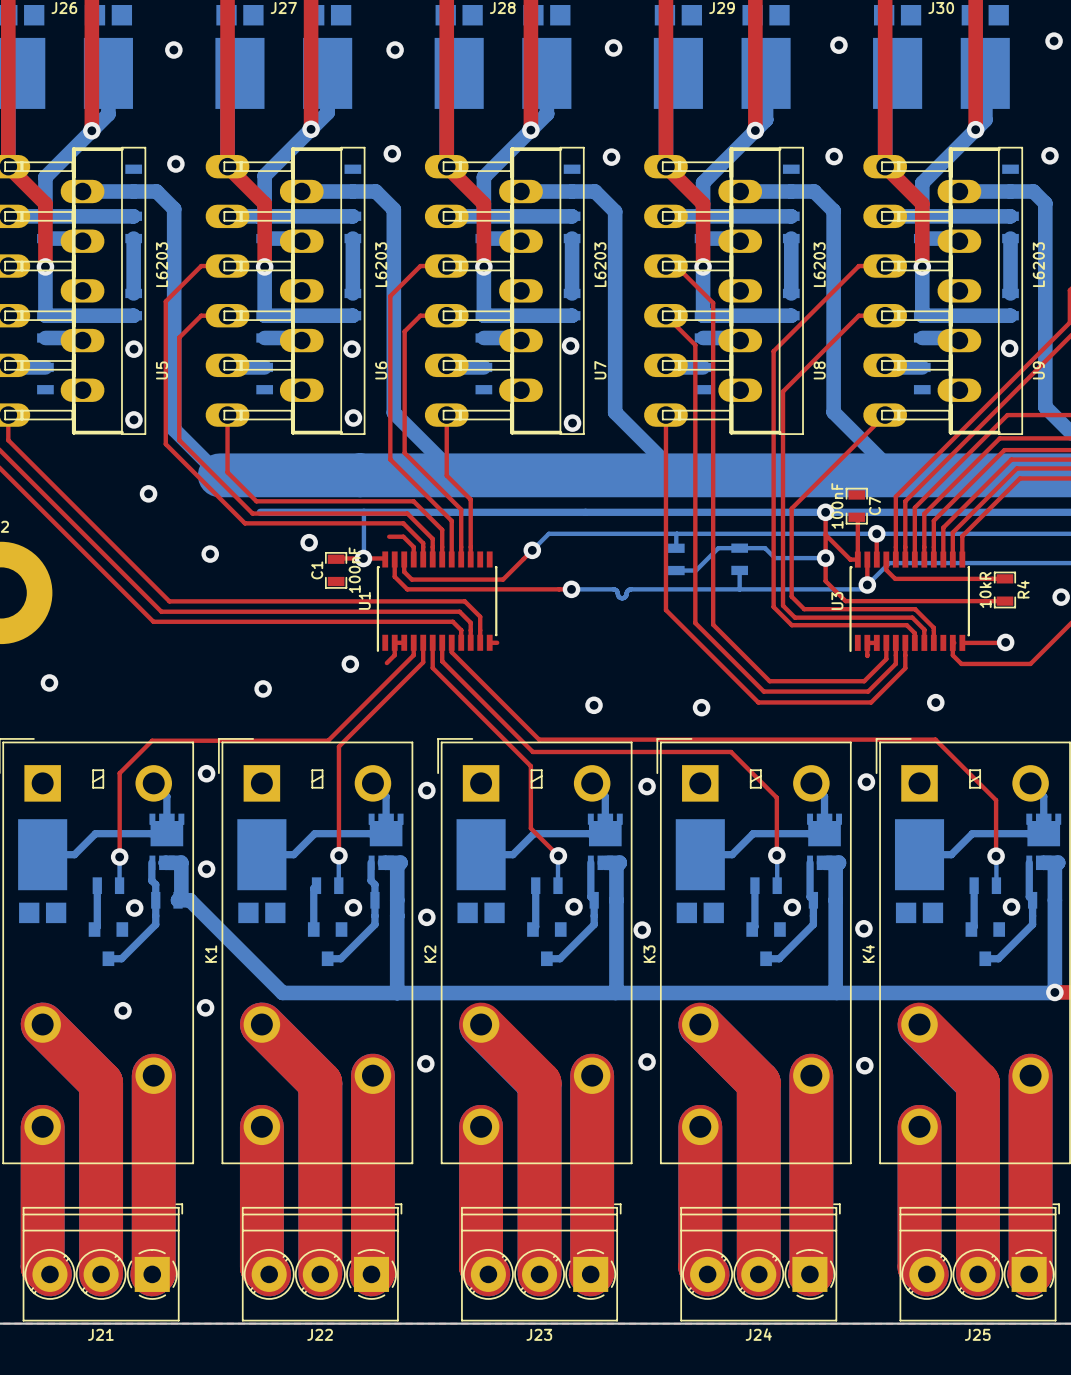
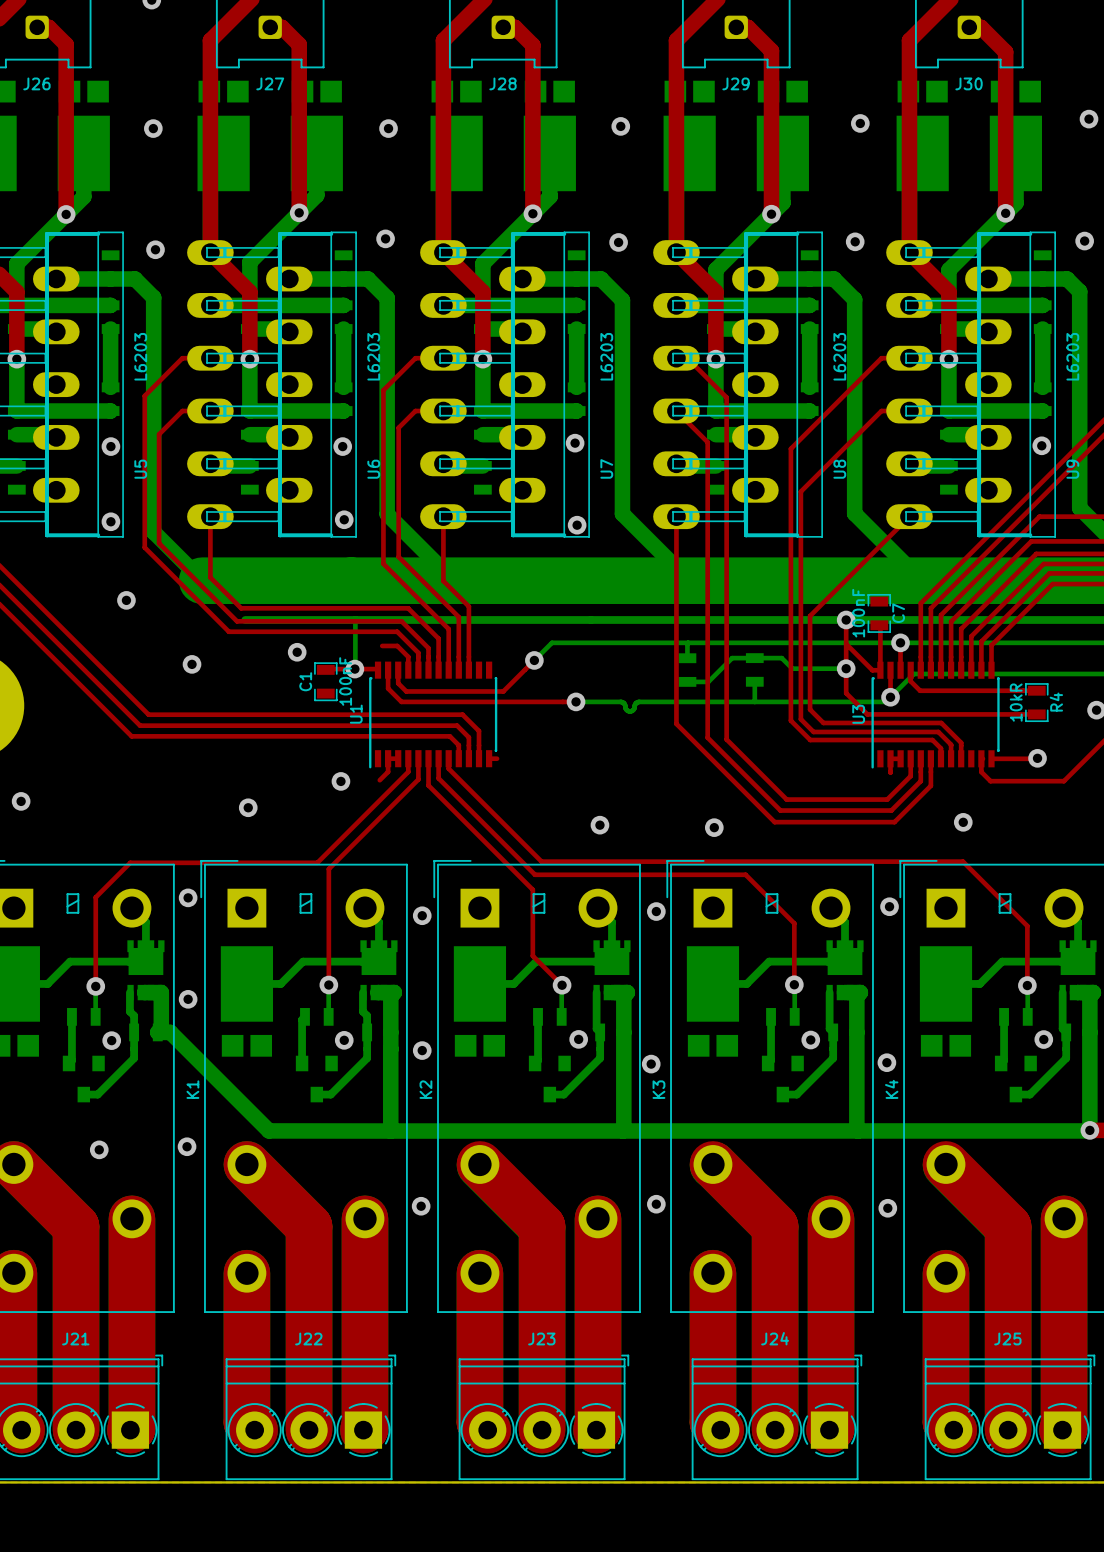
J21 name position: J21 (100, 1334) -> J21 (75, 1338)
J22 name position: J22 (320, 1334) -> J22 (308, 1338)
J23 name position: J23 (539, 1334) -> J23 (541, 1338)
J24 name position: J24 (758, 1334) -> J24 (775, 1338)
J25 name position: J25 (977, 1334) -> J25 (1007, 1338)

